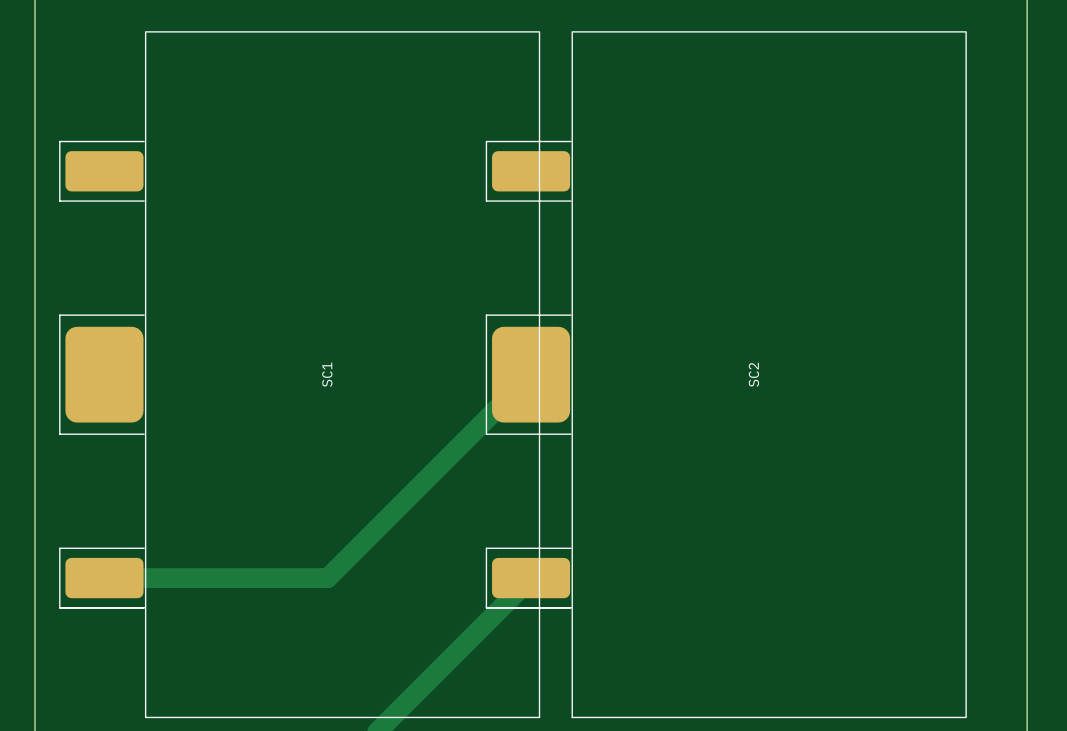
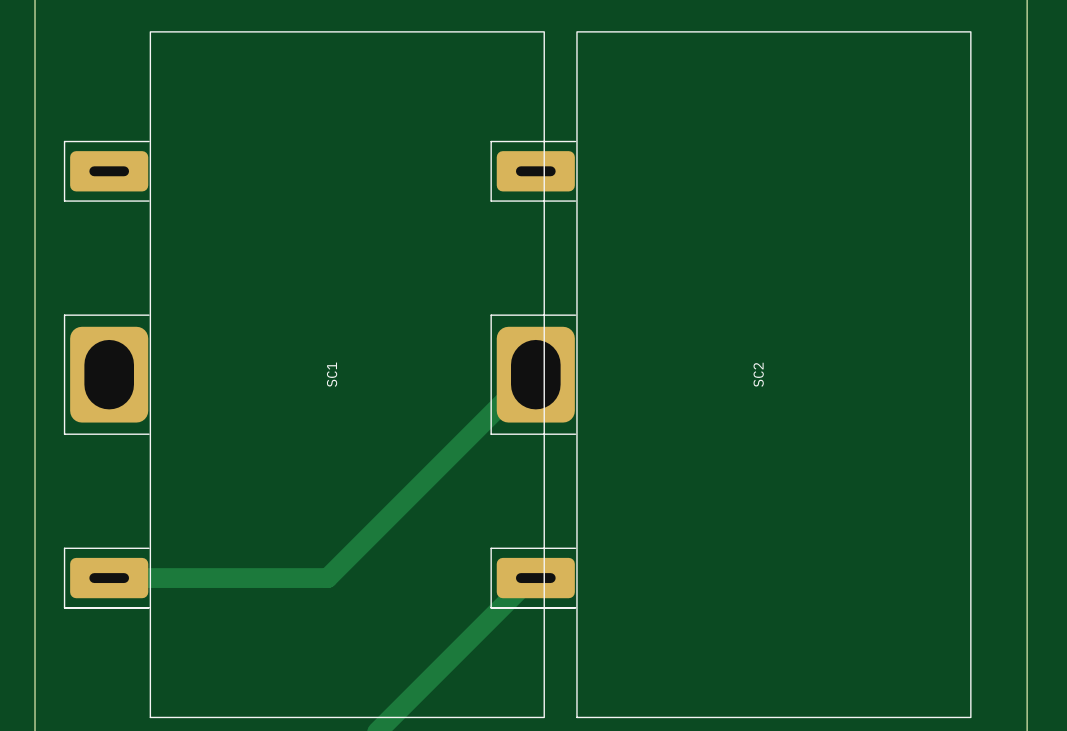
SC1 footprint: [59, 31, 541, 718] -> [64, 31, 545, 718]
SC2 footprint: [485, 31, 967, 718] -> [490, 31, 972, 718]

